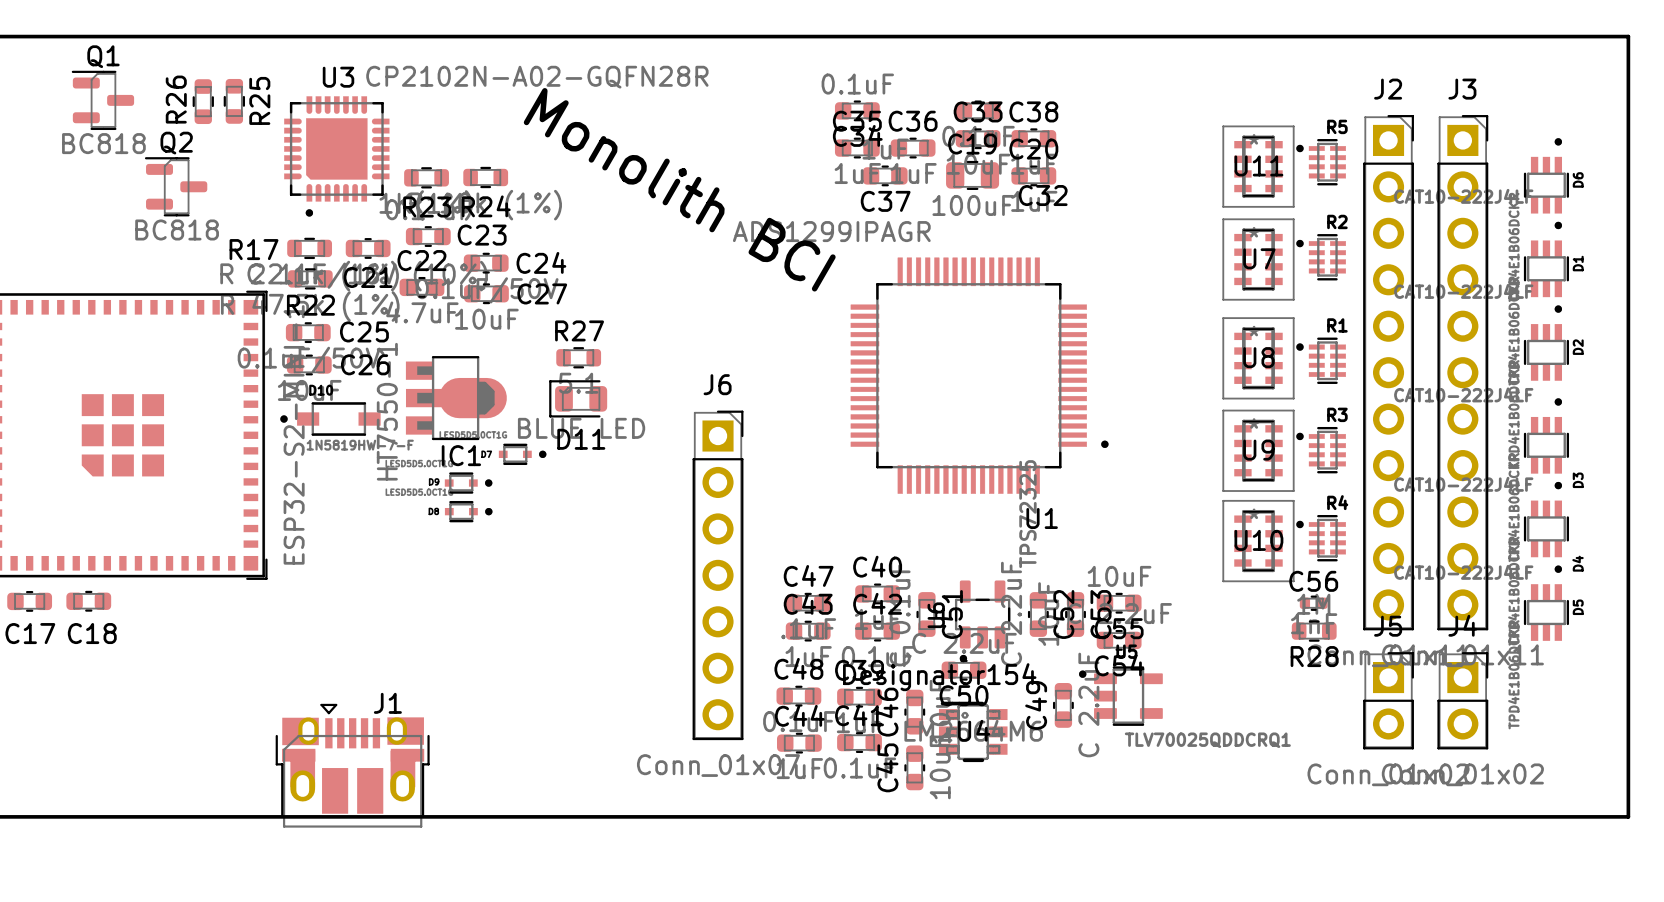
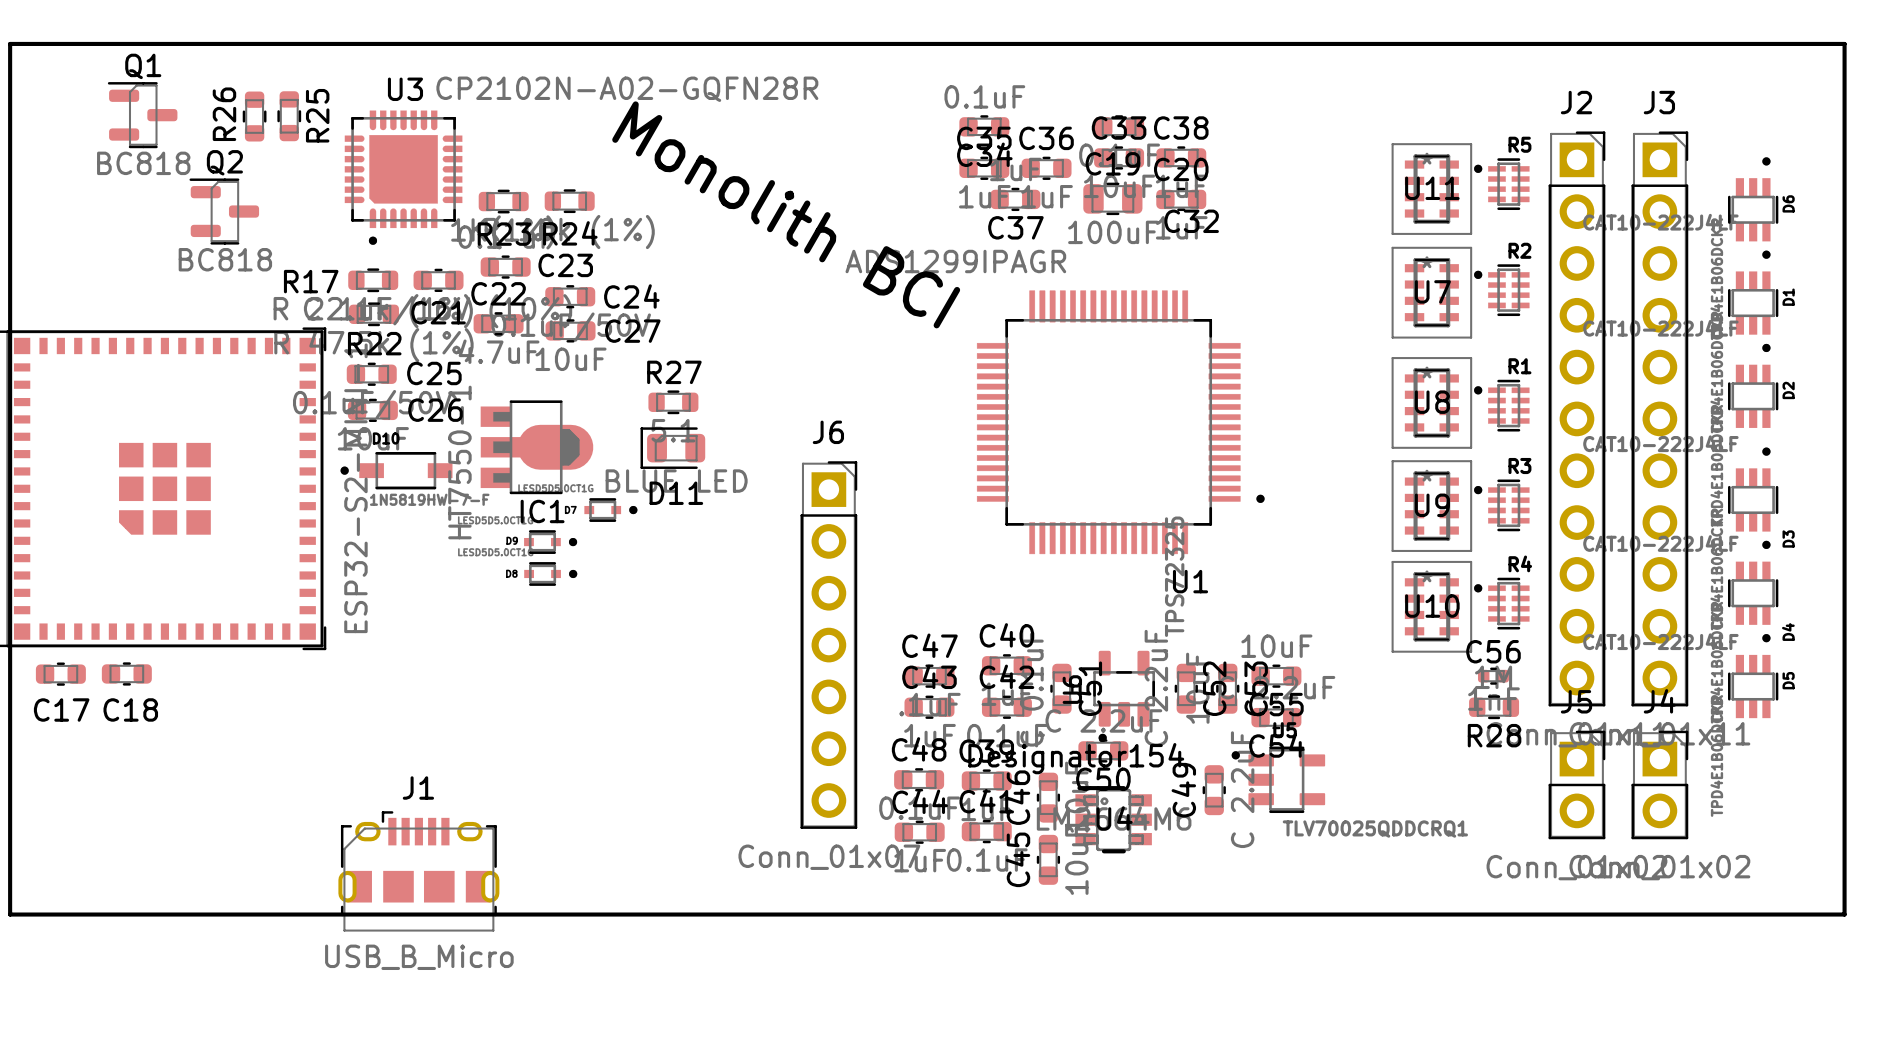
J1 footprint: [275, 703, 430, 828] -> [338, 811, 500, 932]
J1 name position: J1 (387, 703) -> J1 (418, 788)
J1 value: none -> USB_B_Micro (419, 957)

